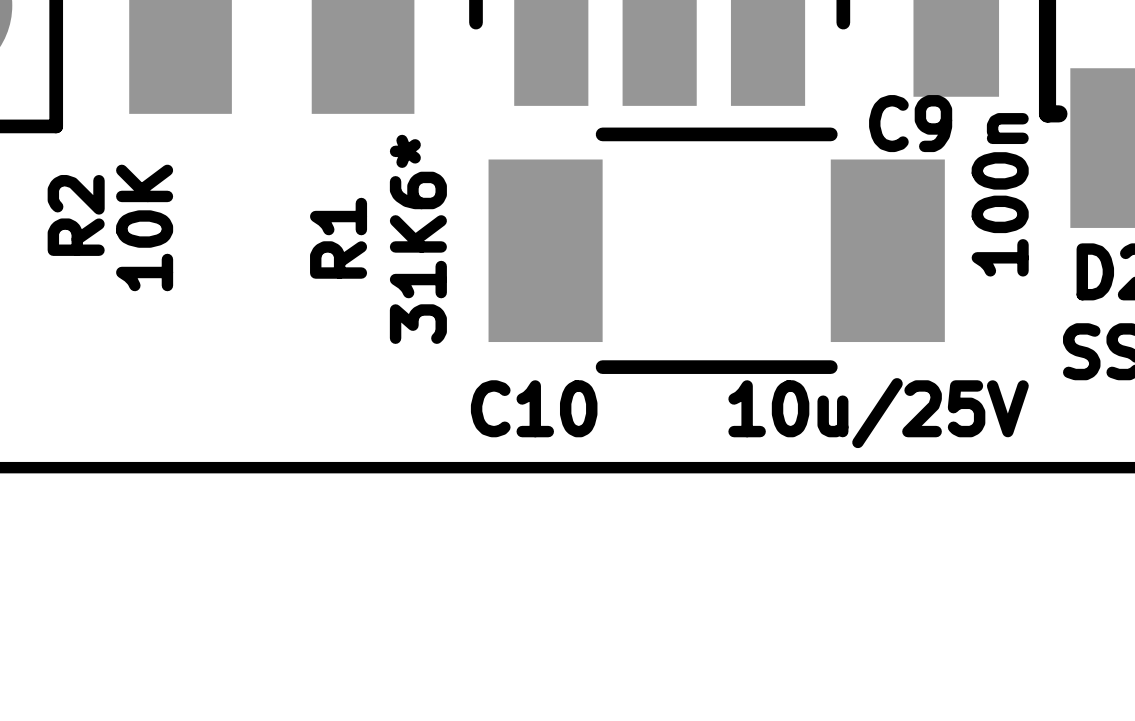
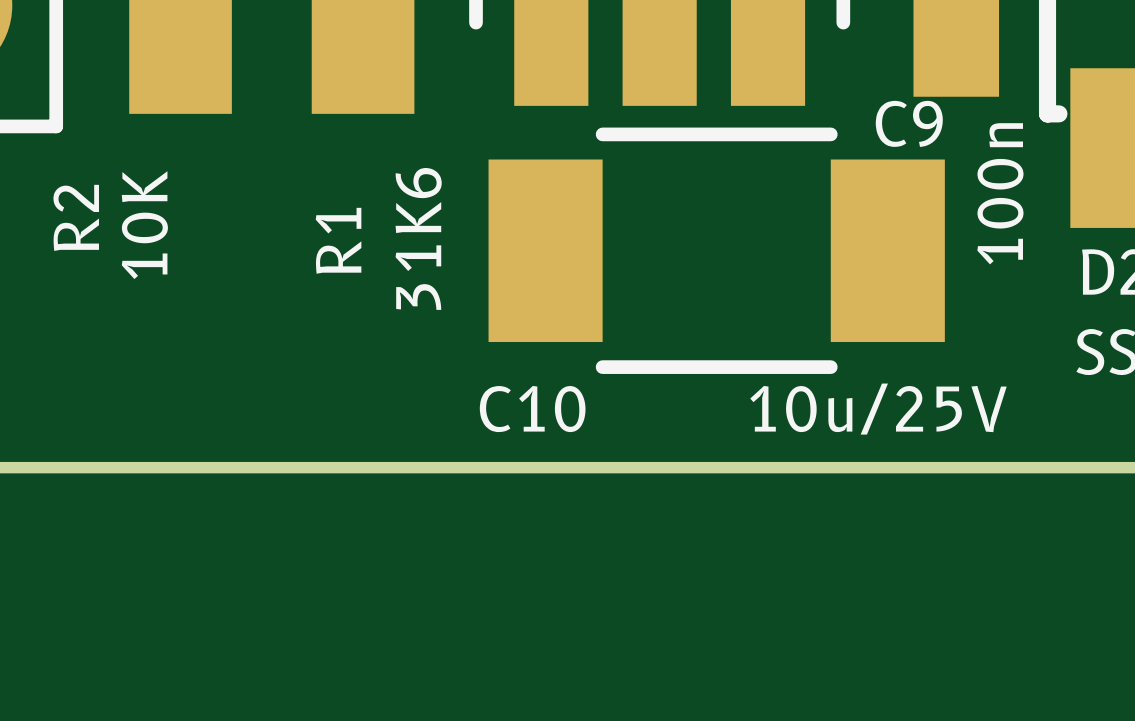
R1 value: 31K6* (418, 239) -> 31K6 (418, 238)

